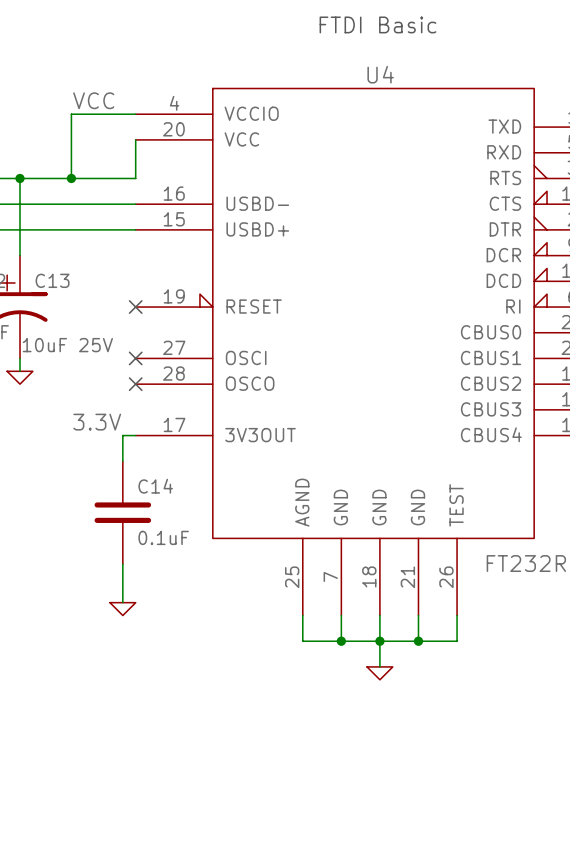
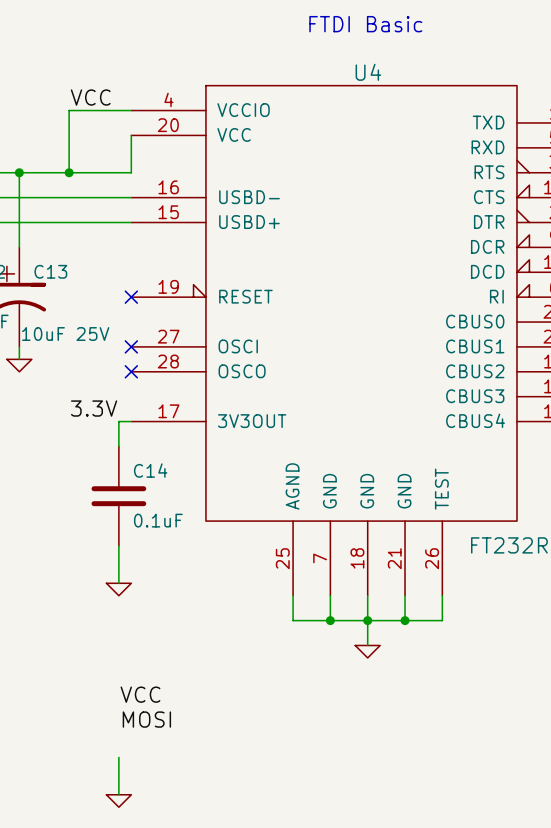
label: none -> VCC (140, 694)
label: none -> MOSI (146, 719)
wire: none -> (118, 757) (118, 794)
power symbol: none -> (118, 801)

